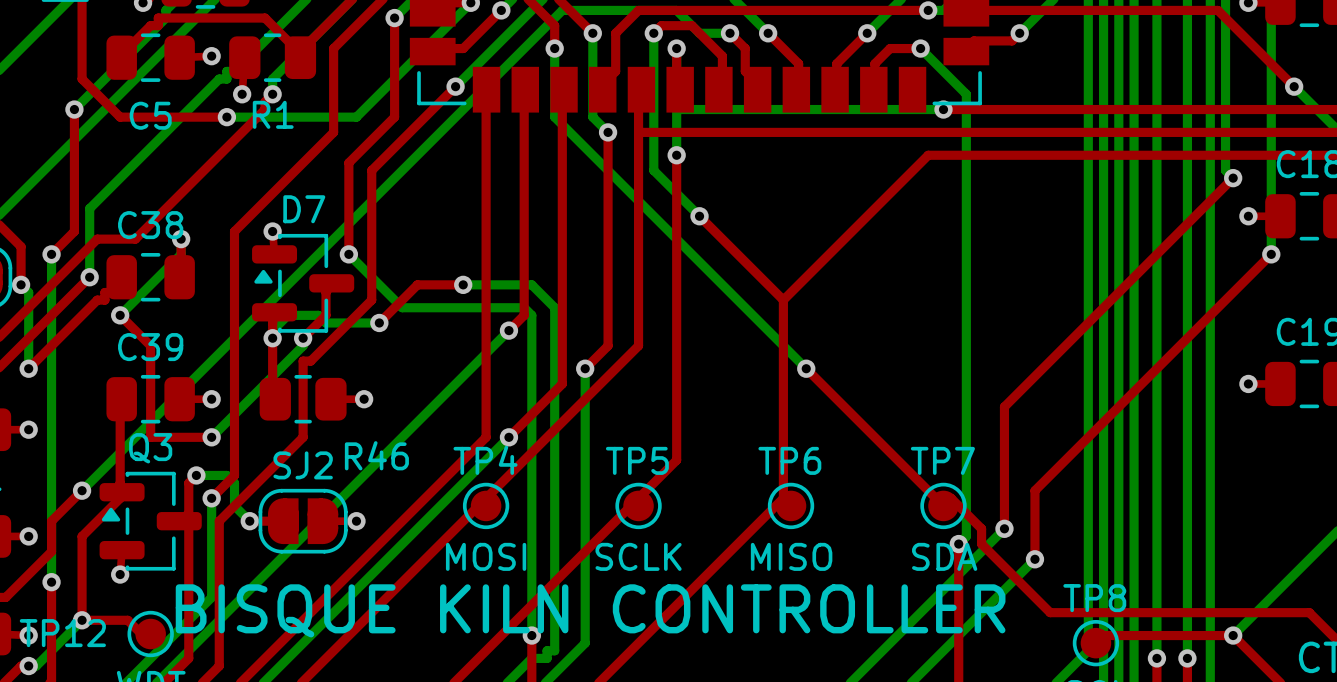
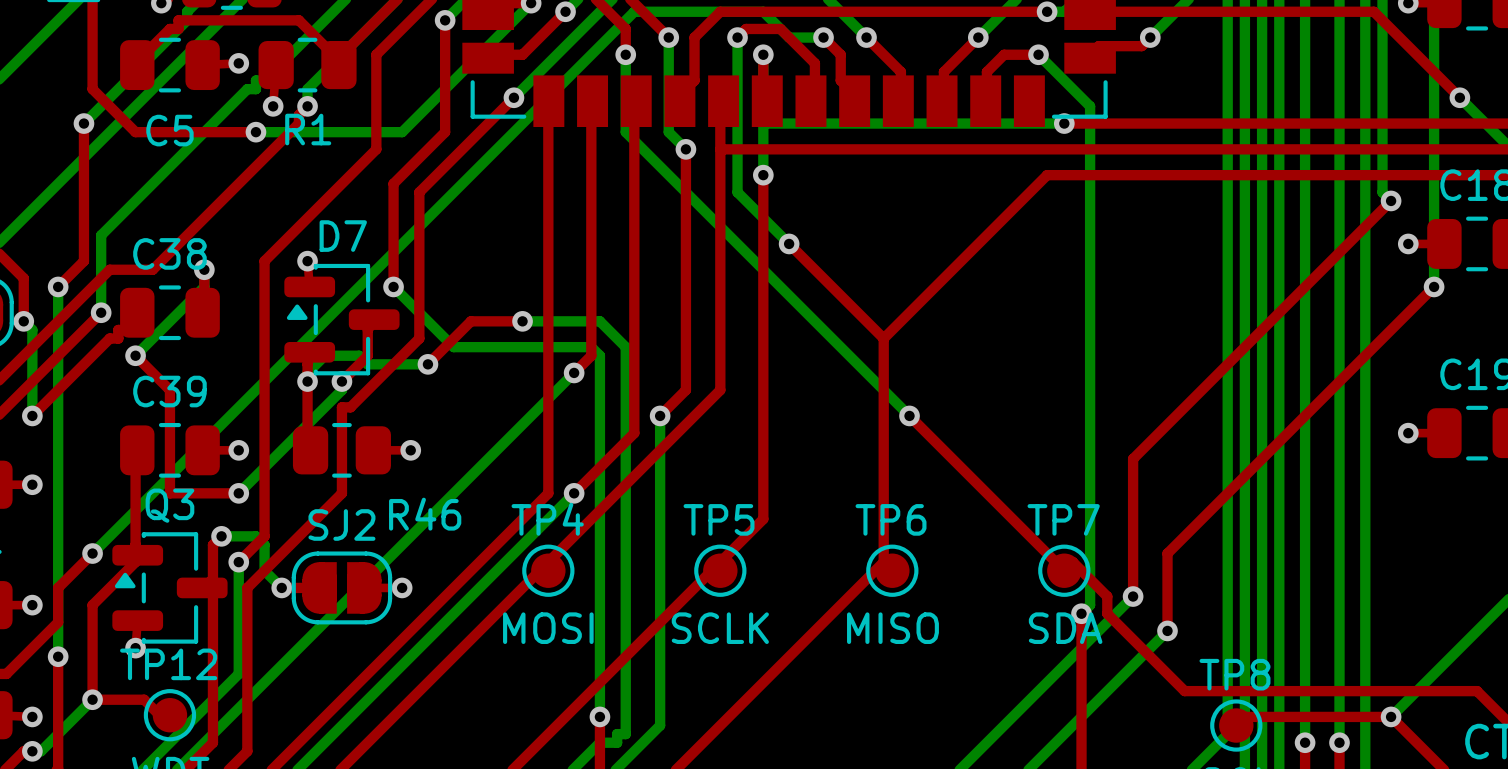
text: BISQUE KILN CONTROLLER (590, 610) -> none
TP12 name position: TP12 (62, 633) -> TP12 (168, 664)

